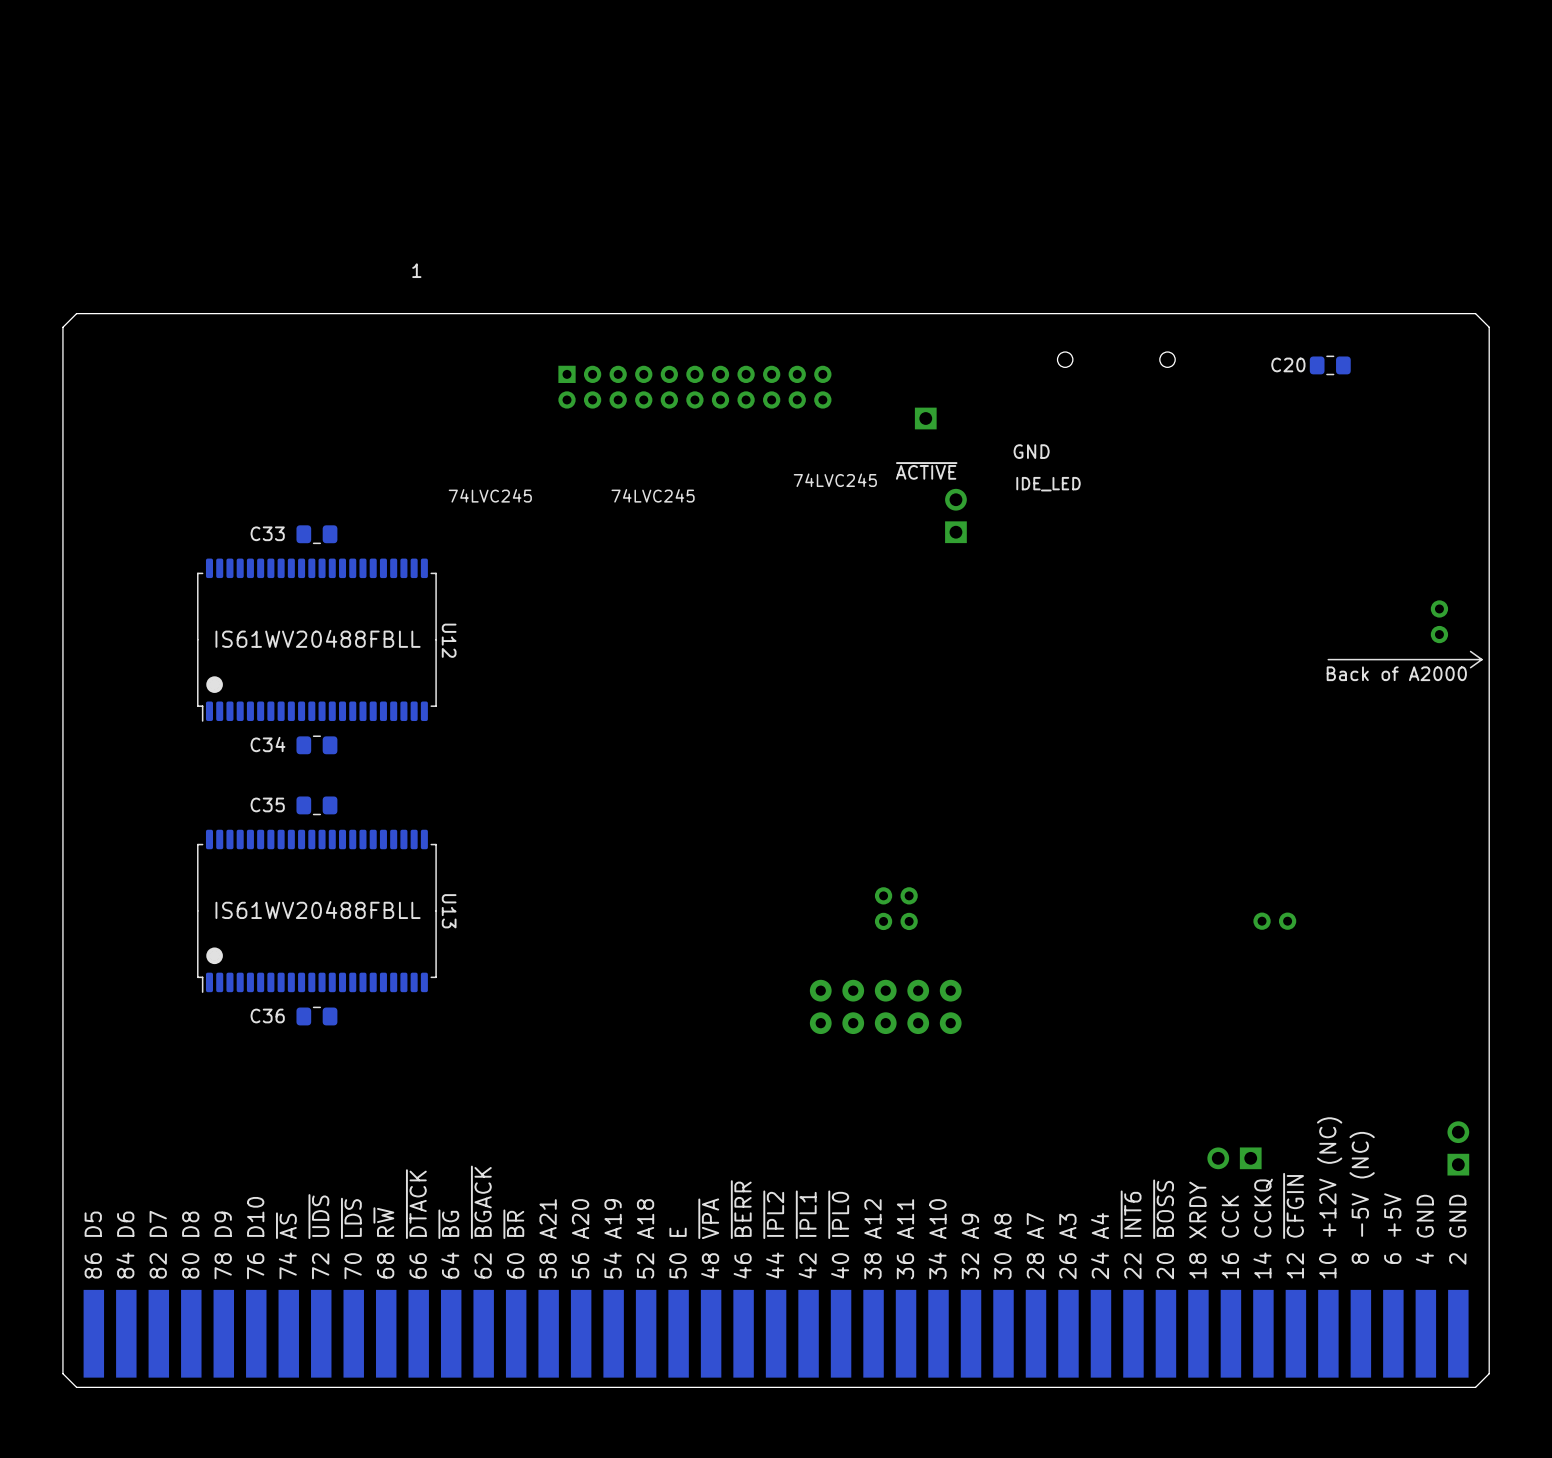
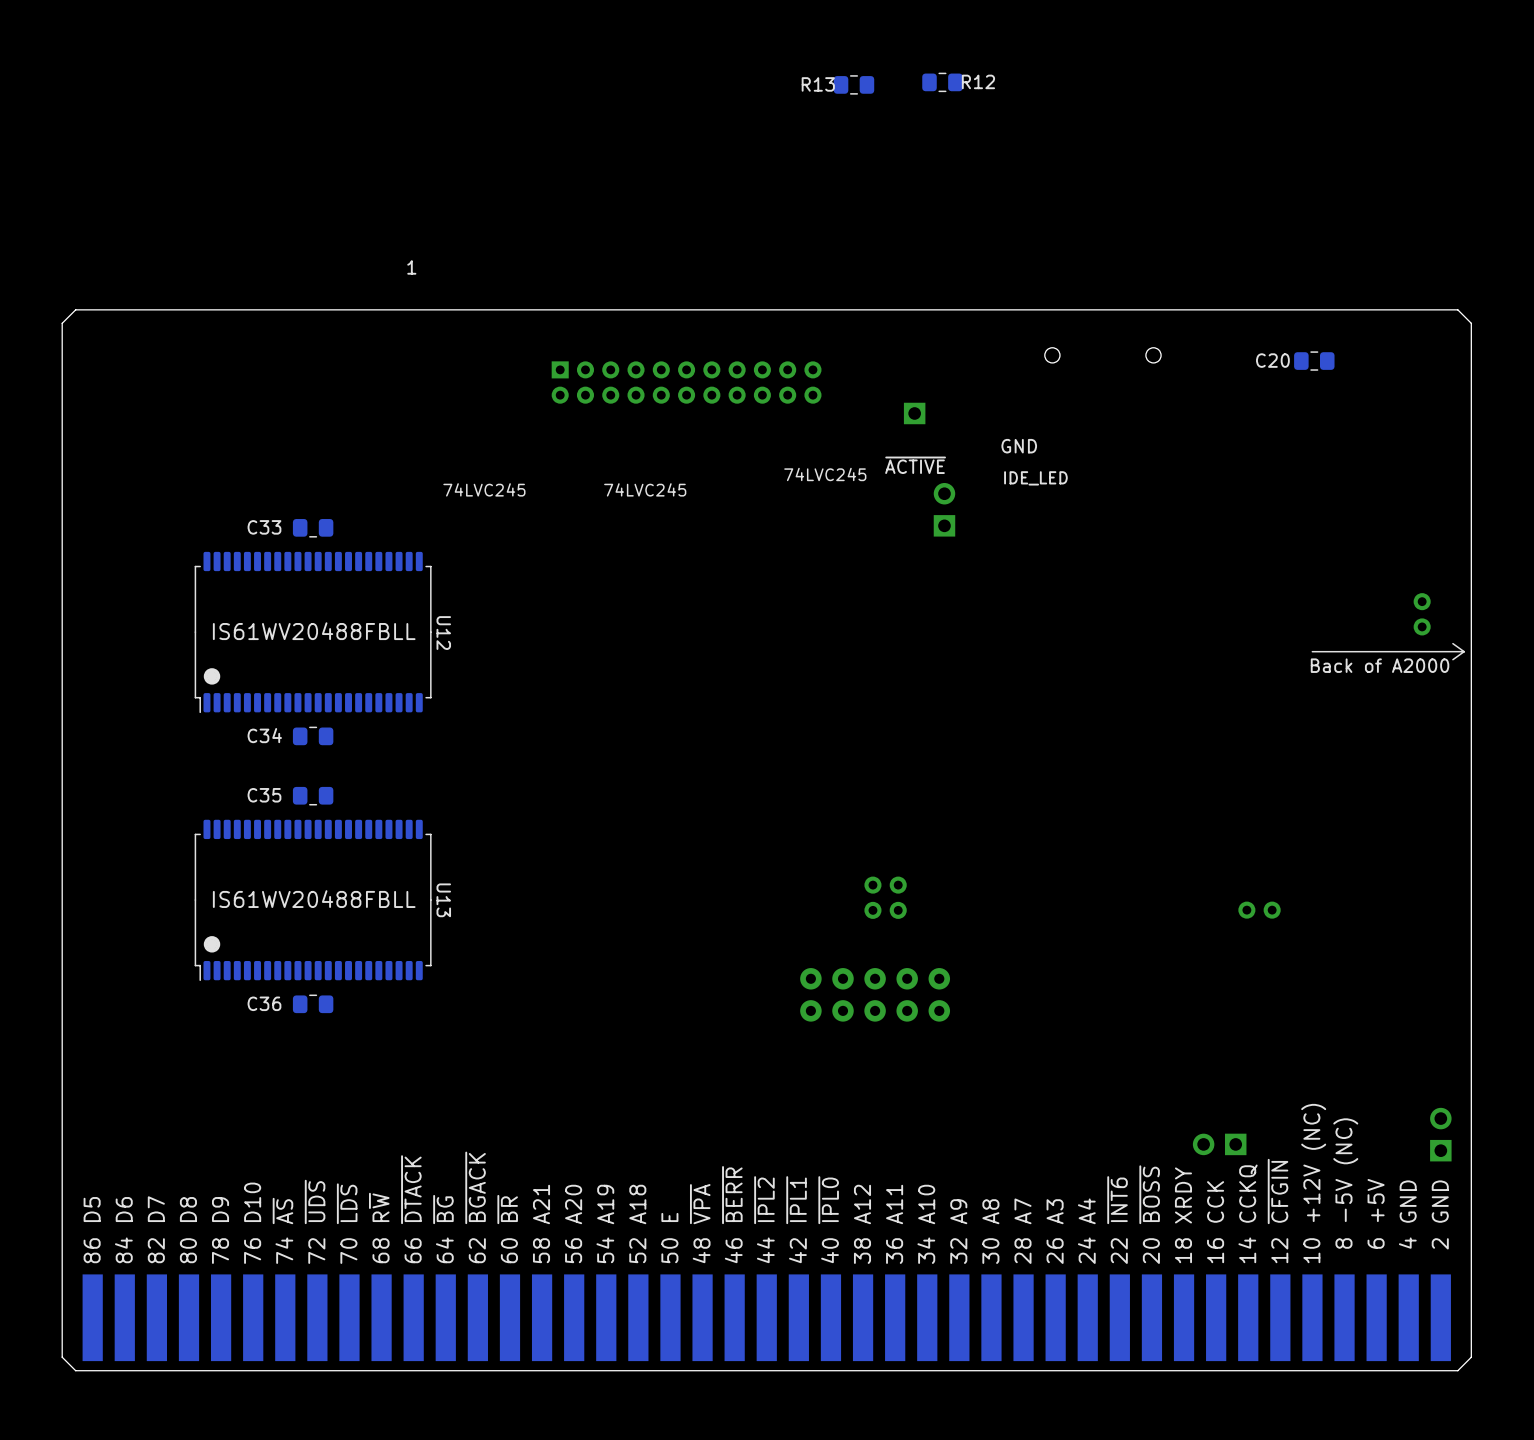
R12: none -> (942, 82)
R13: none -> (854, 84)

